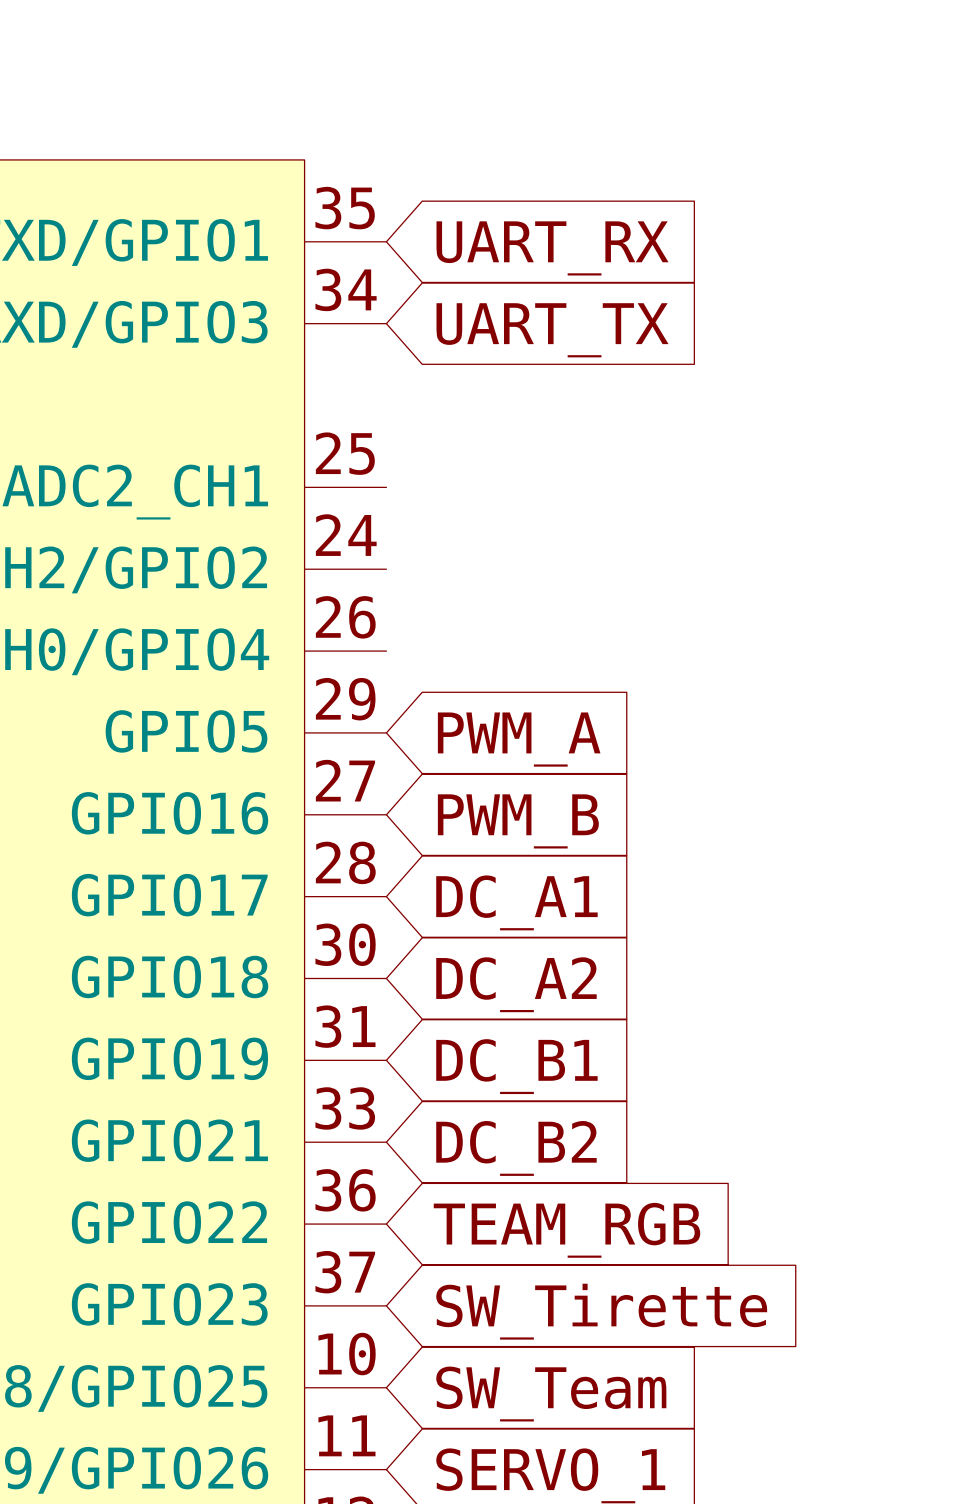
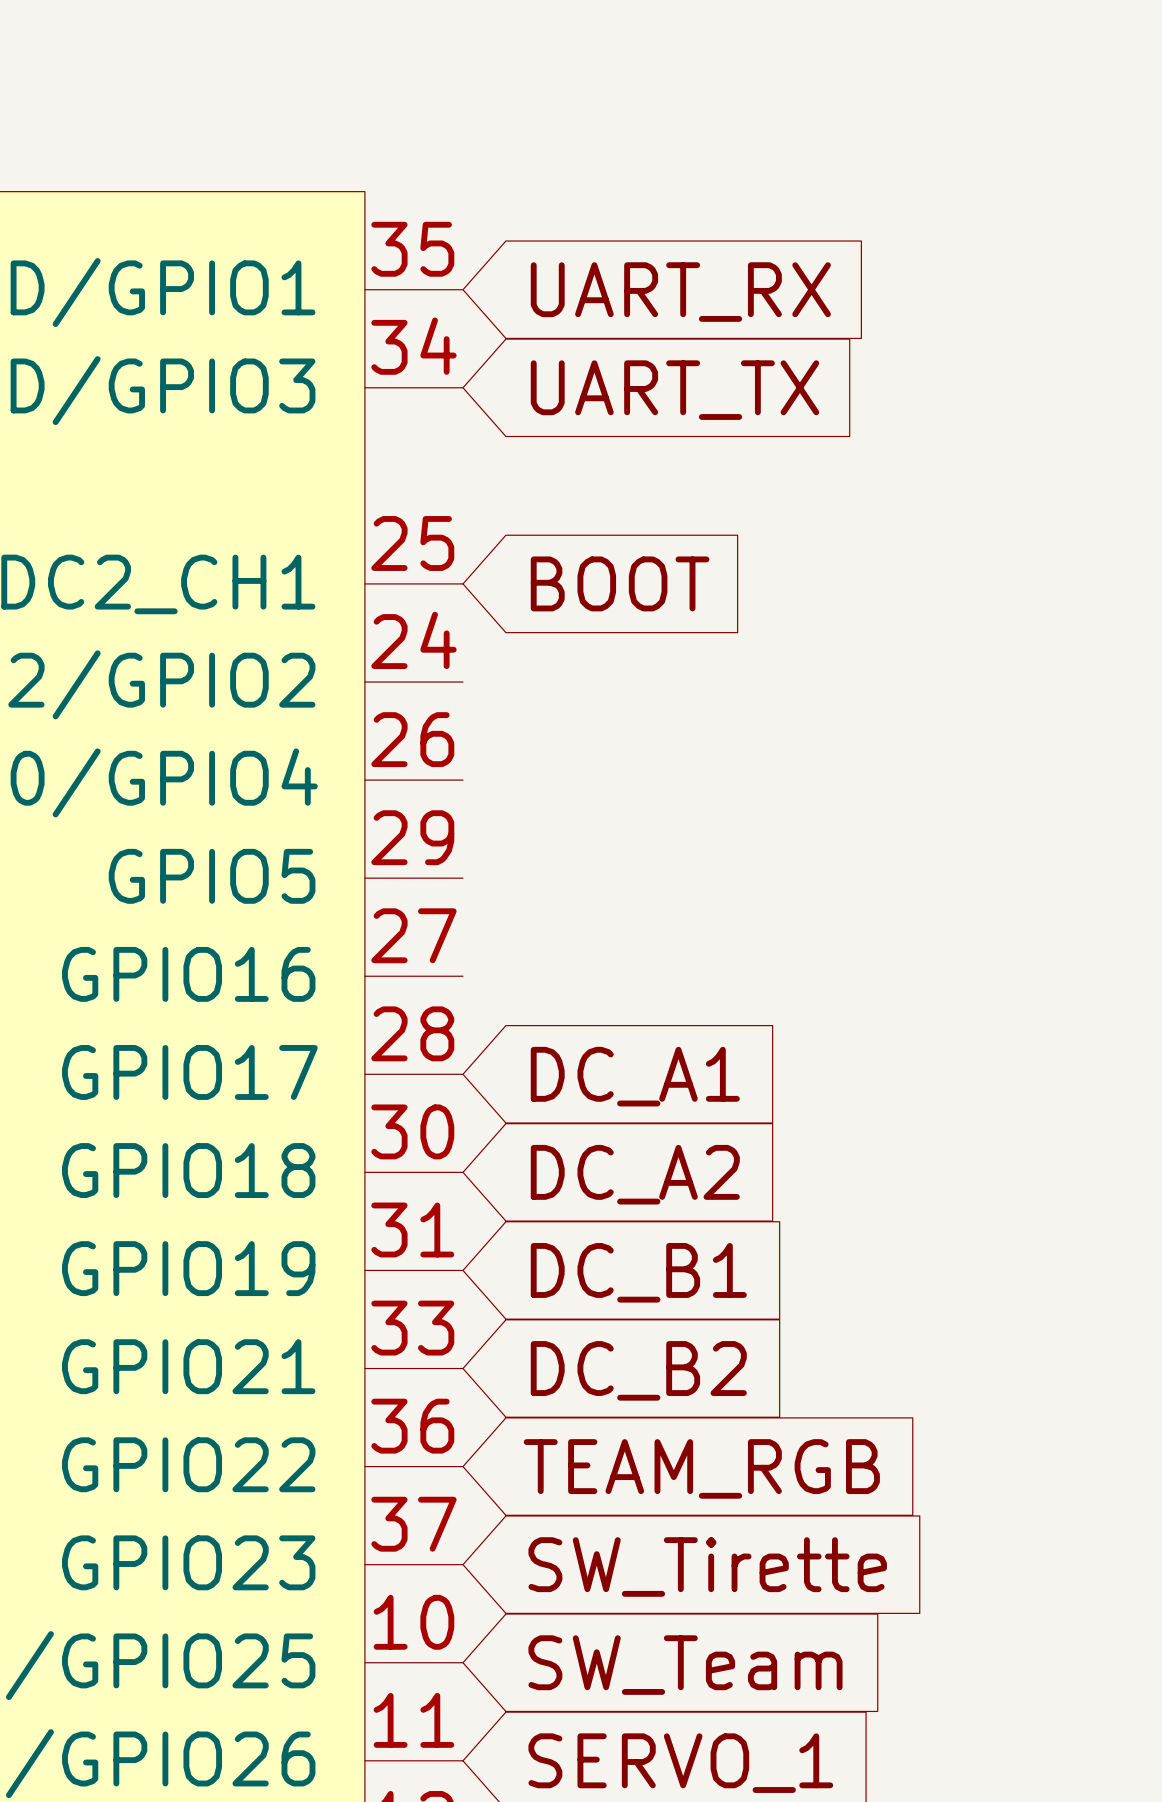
global label: none -> BOOT (620, 583)
global label: PWM_A (519, 739) -> none
global label: PWM_B (518, 821) -> none

